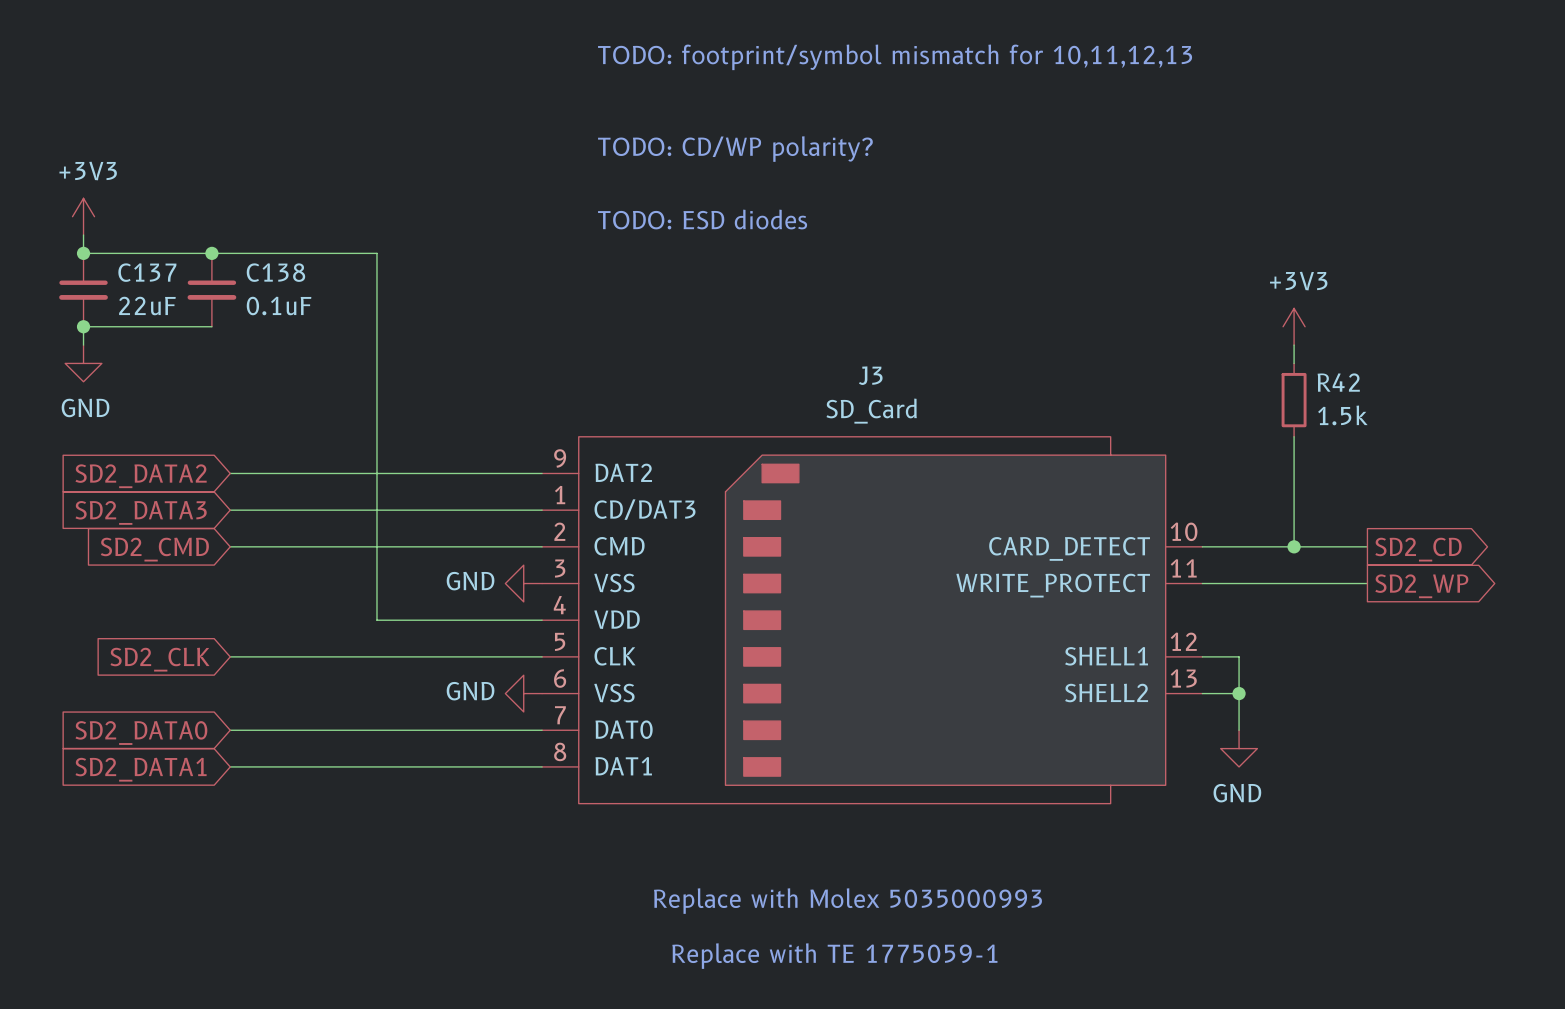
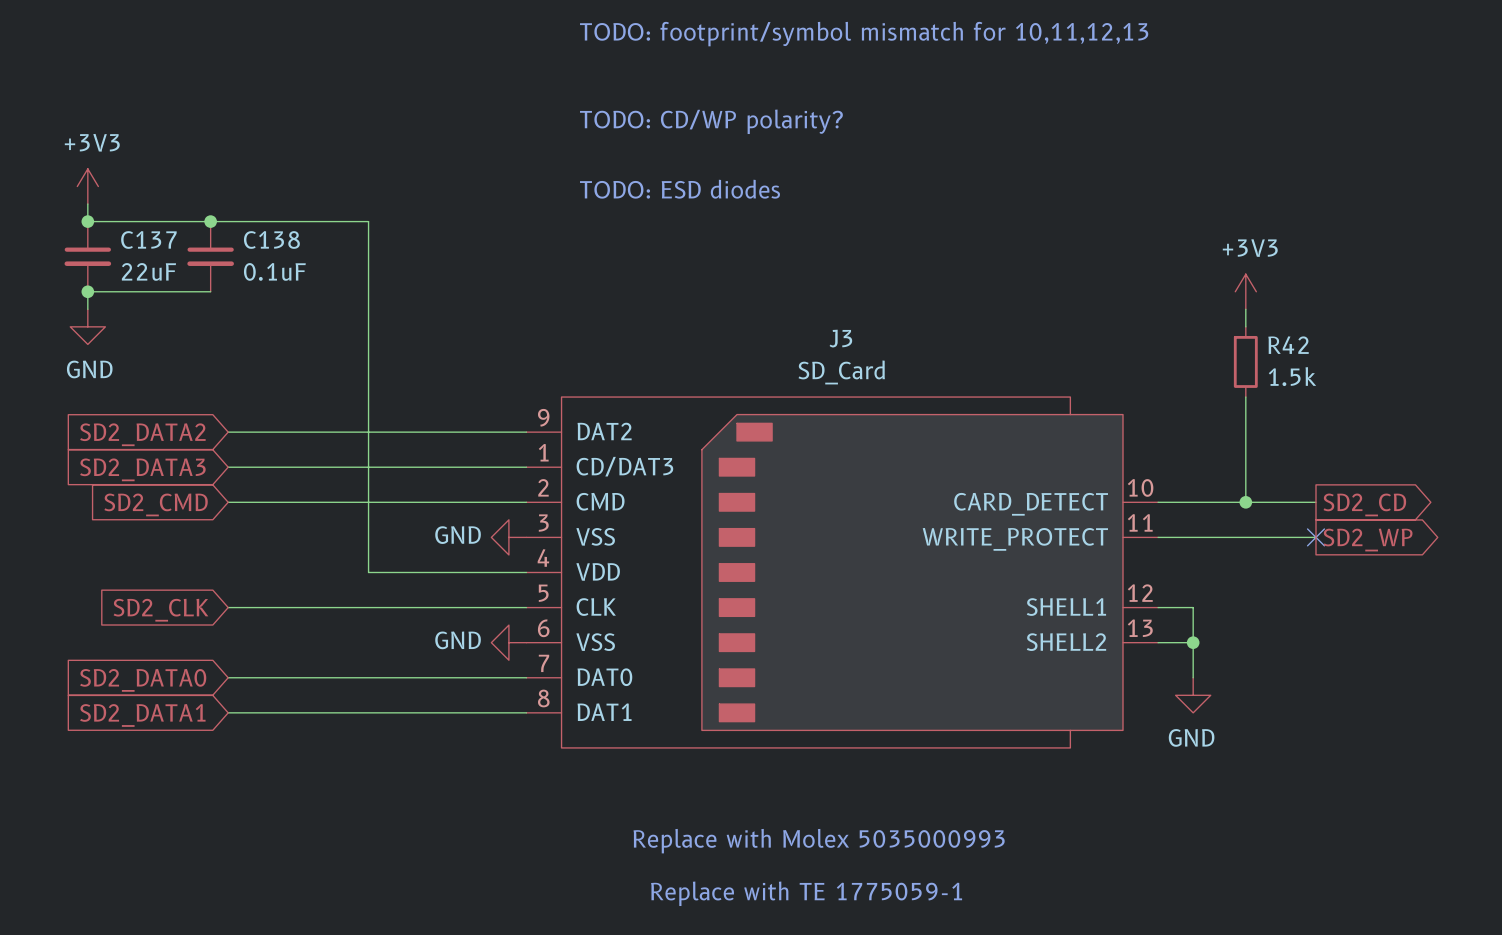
no-connect mark: none -> (1315, 537)

